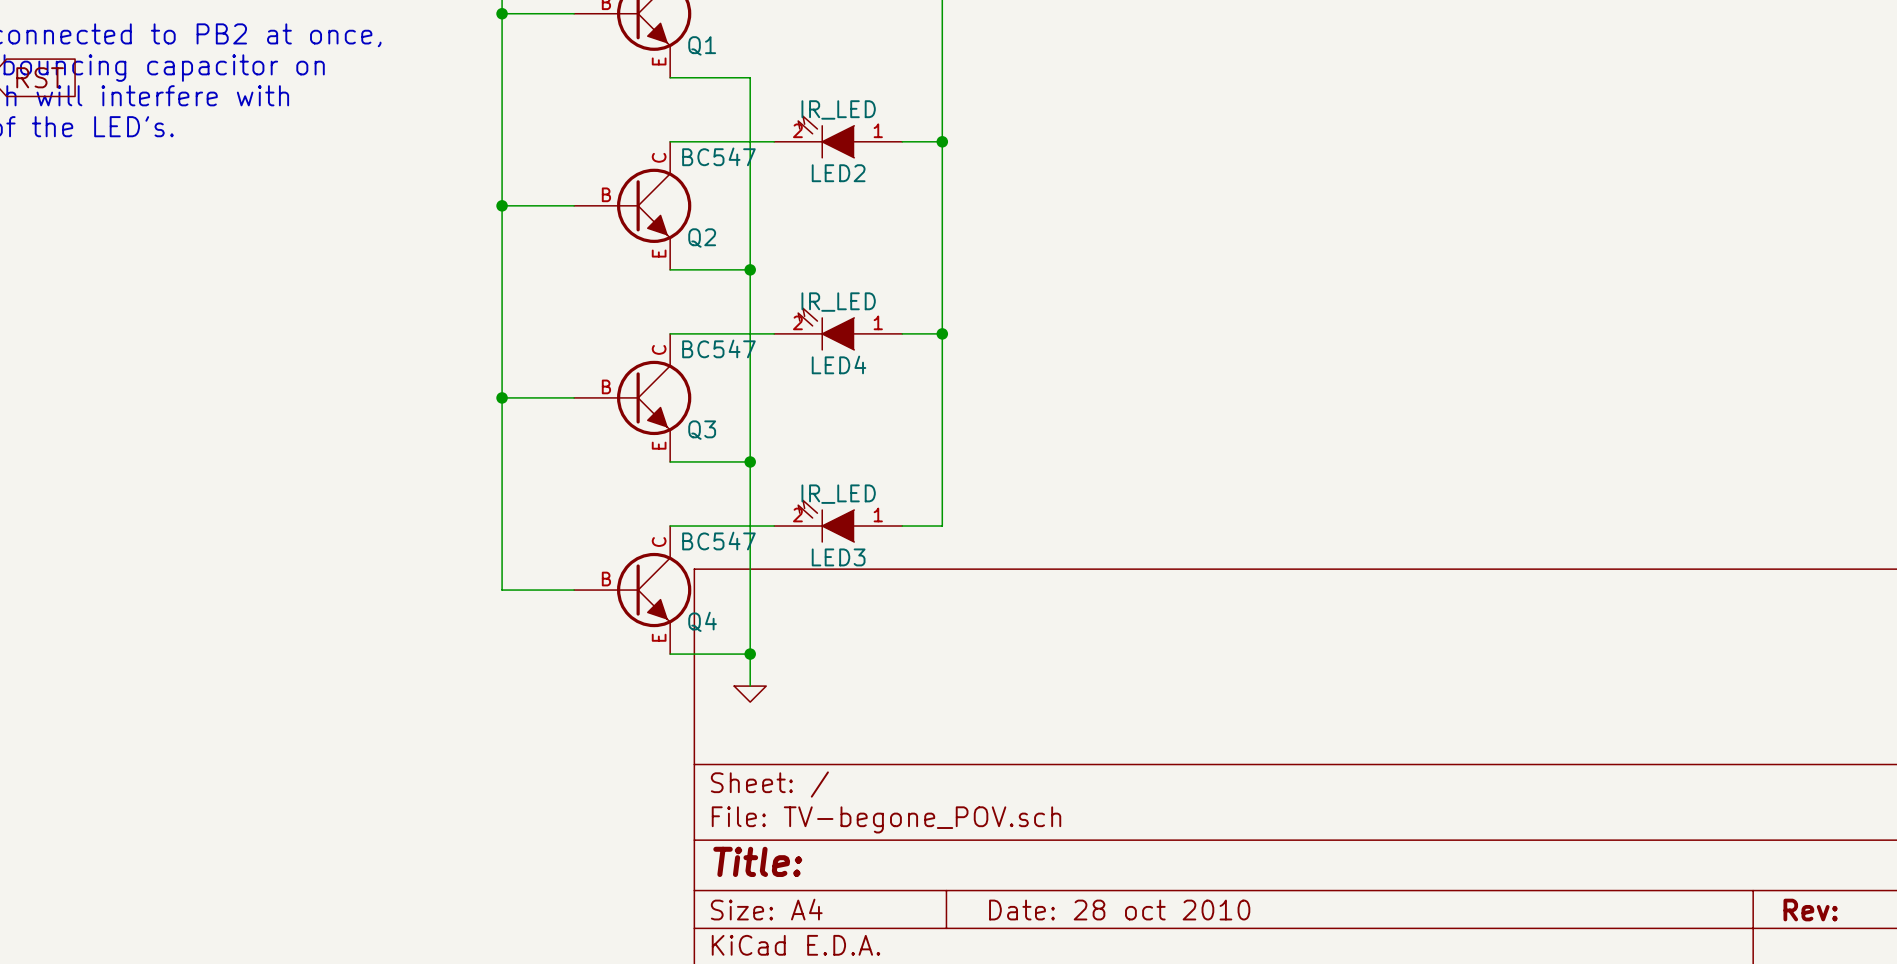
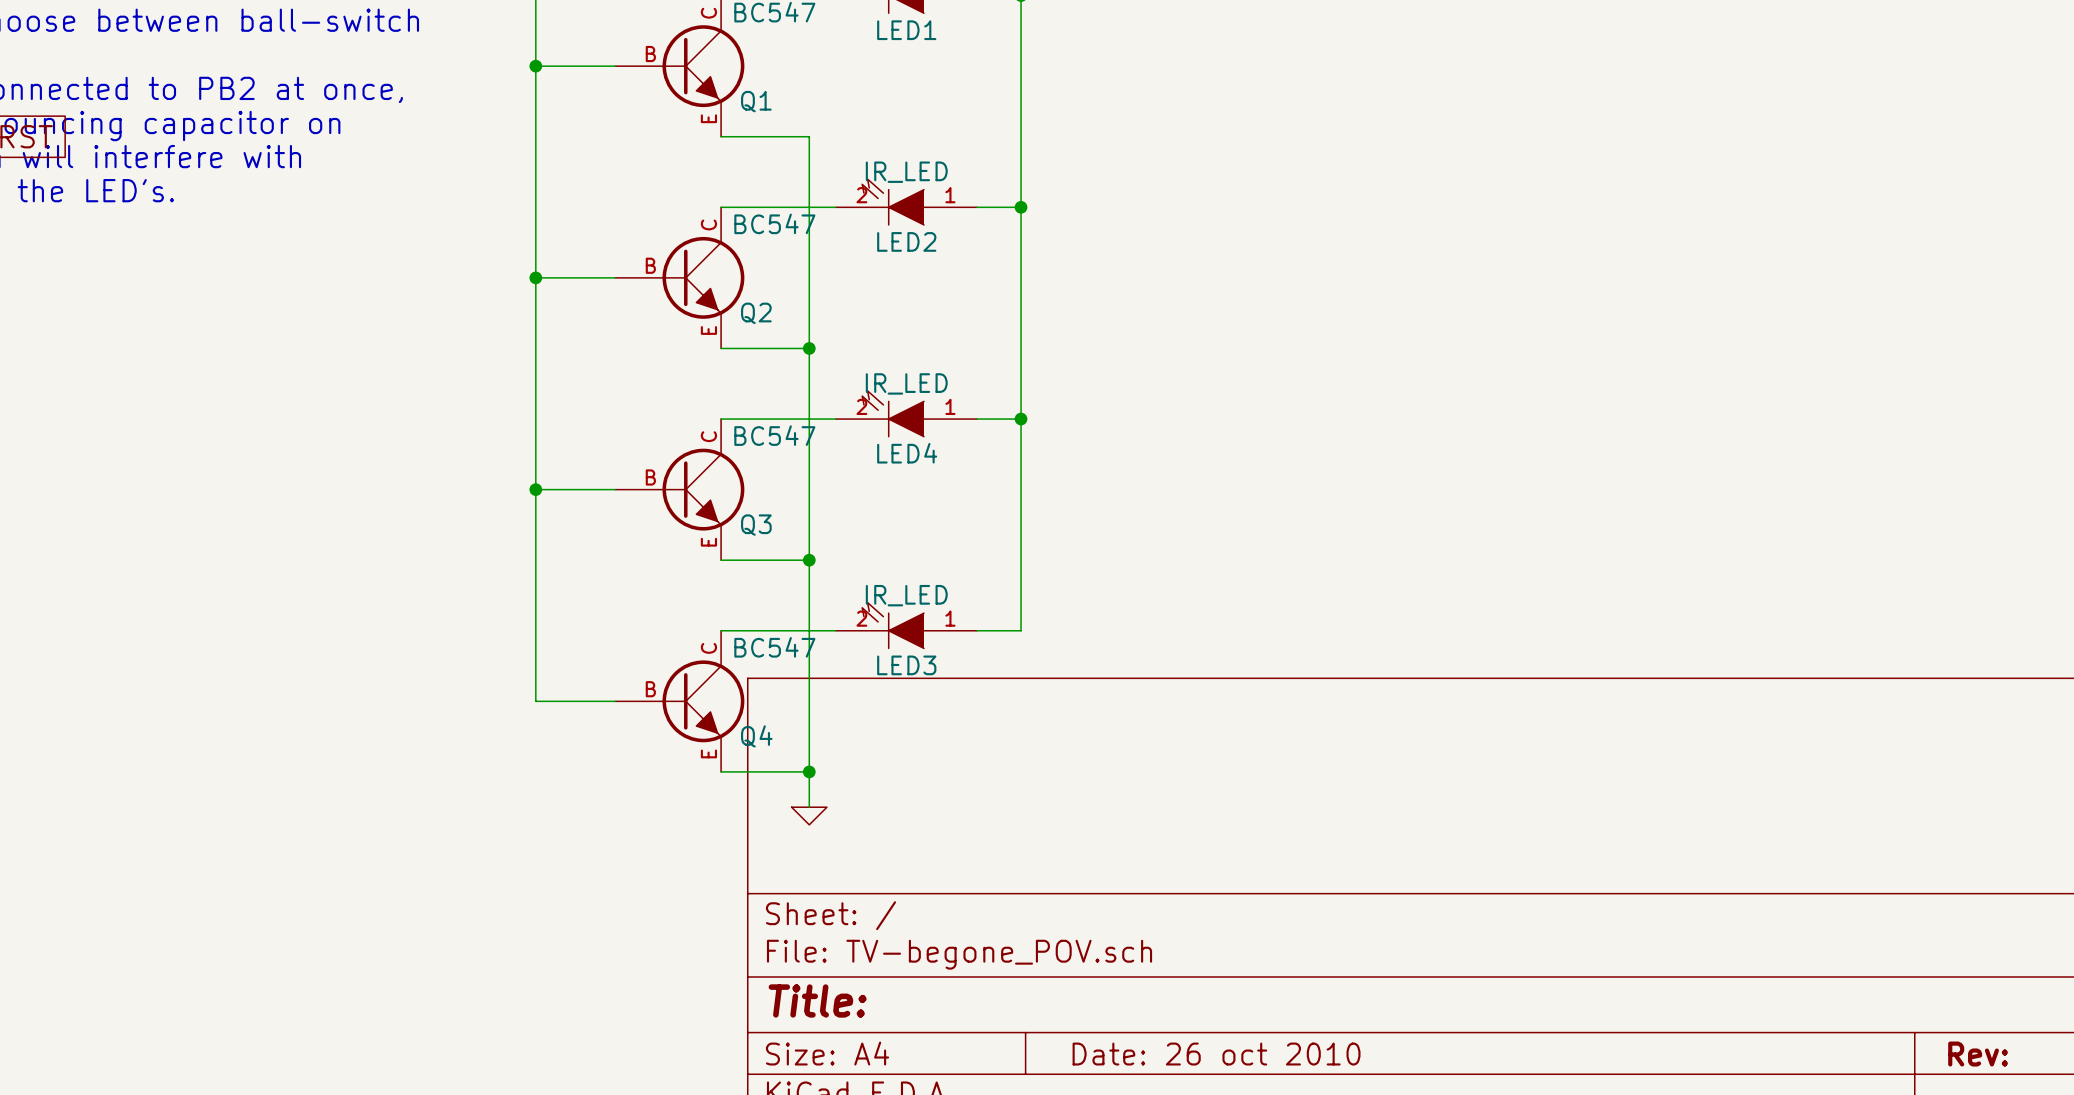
title block: Date: 28 oct 2010 (1119, 910) -> Date: 26 oct 2010 (1216, 1054)

